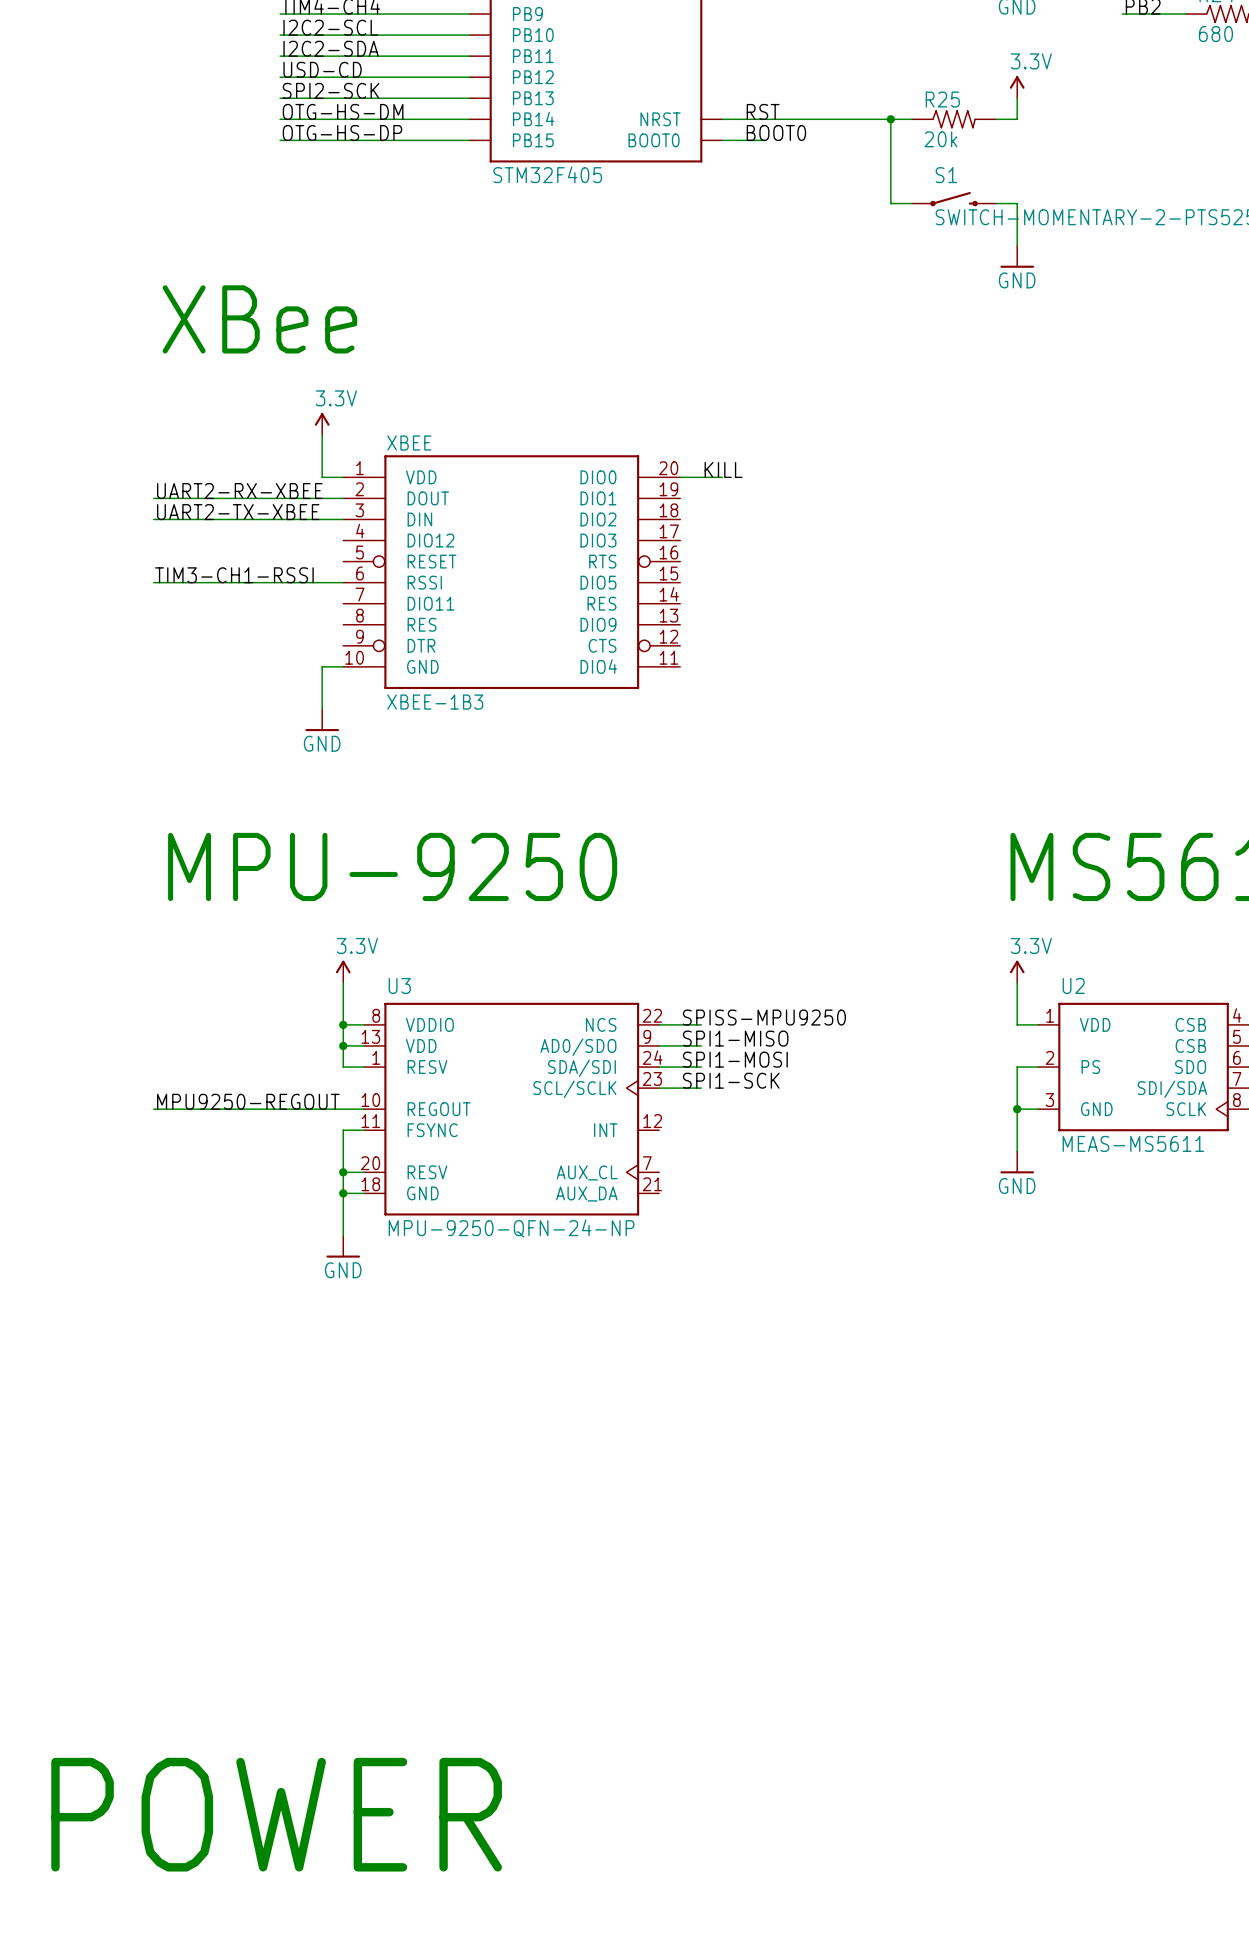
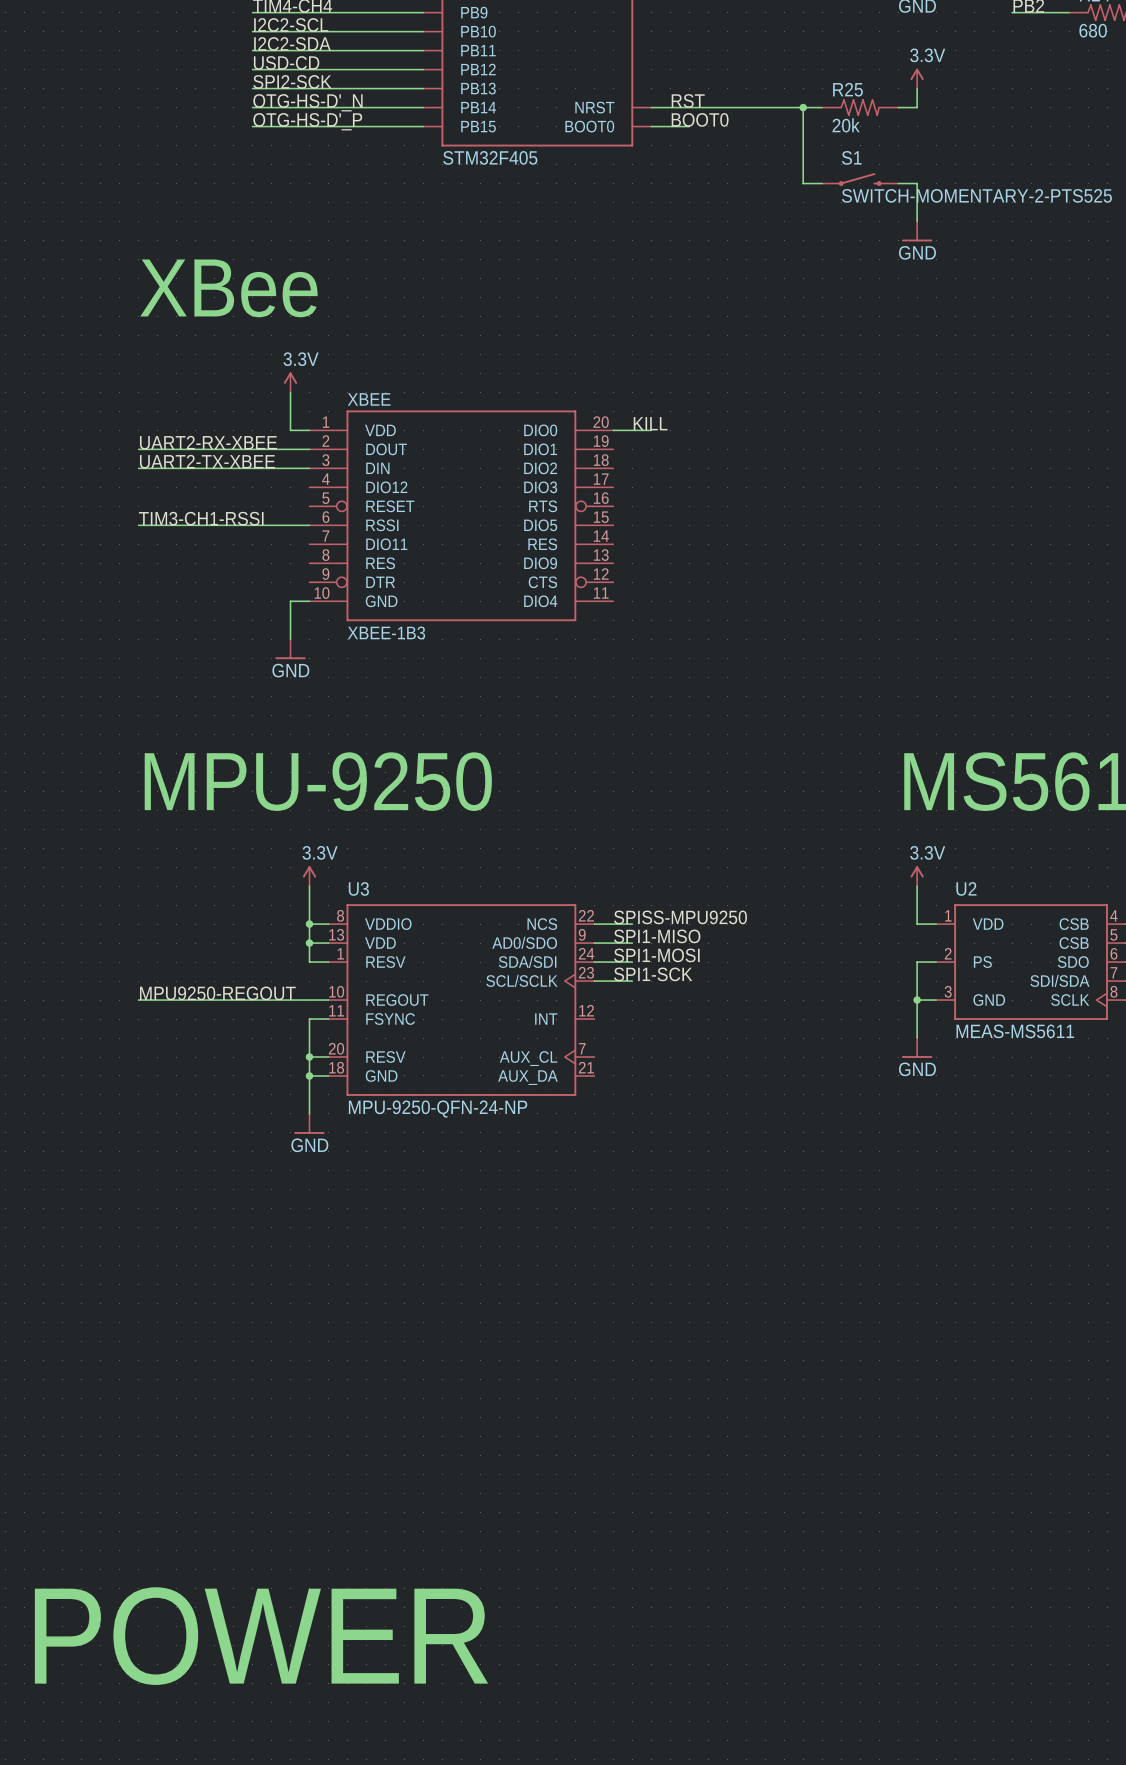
label: OTG-HS-DM (343, 111) -> OTG-HS-D'_N (307, 102)
label: OTG-HS-DP (342, 133) -> OTG-HS-D'_P (307, 121)

